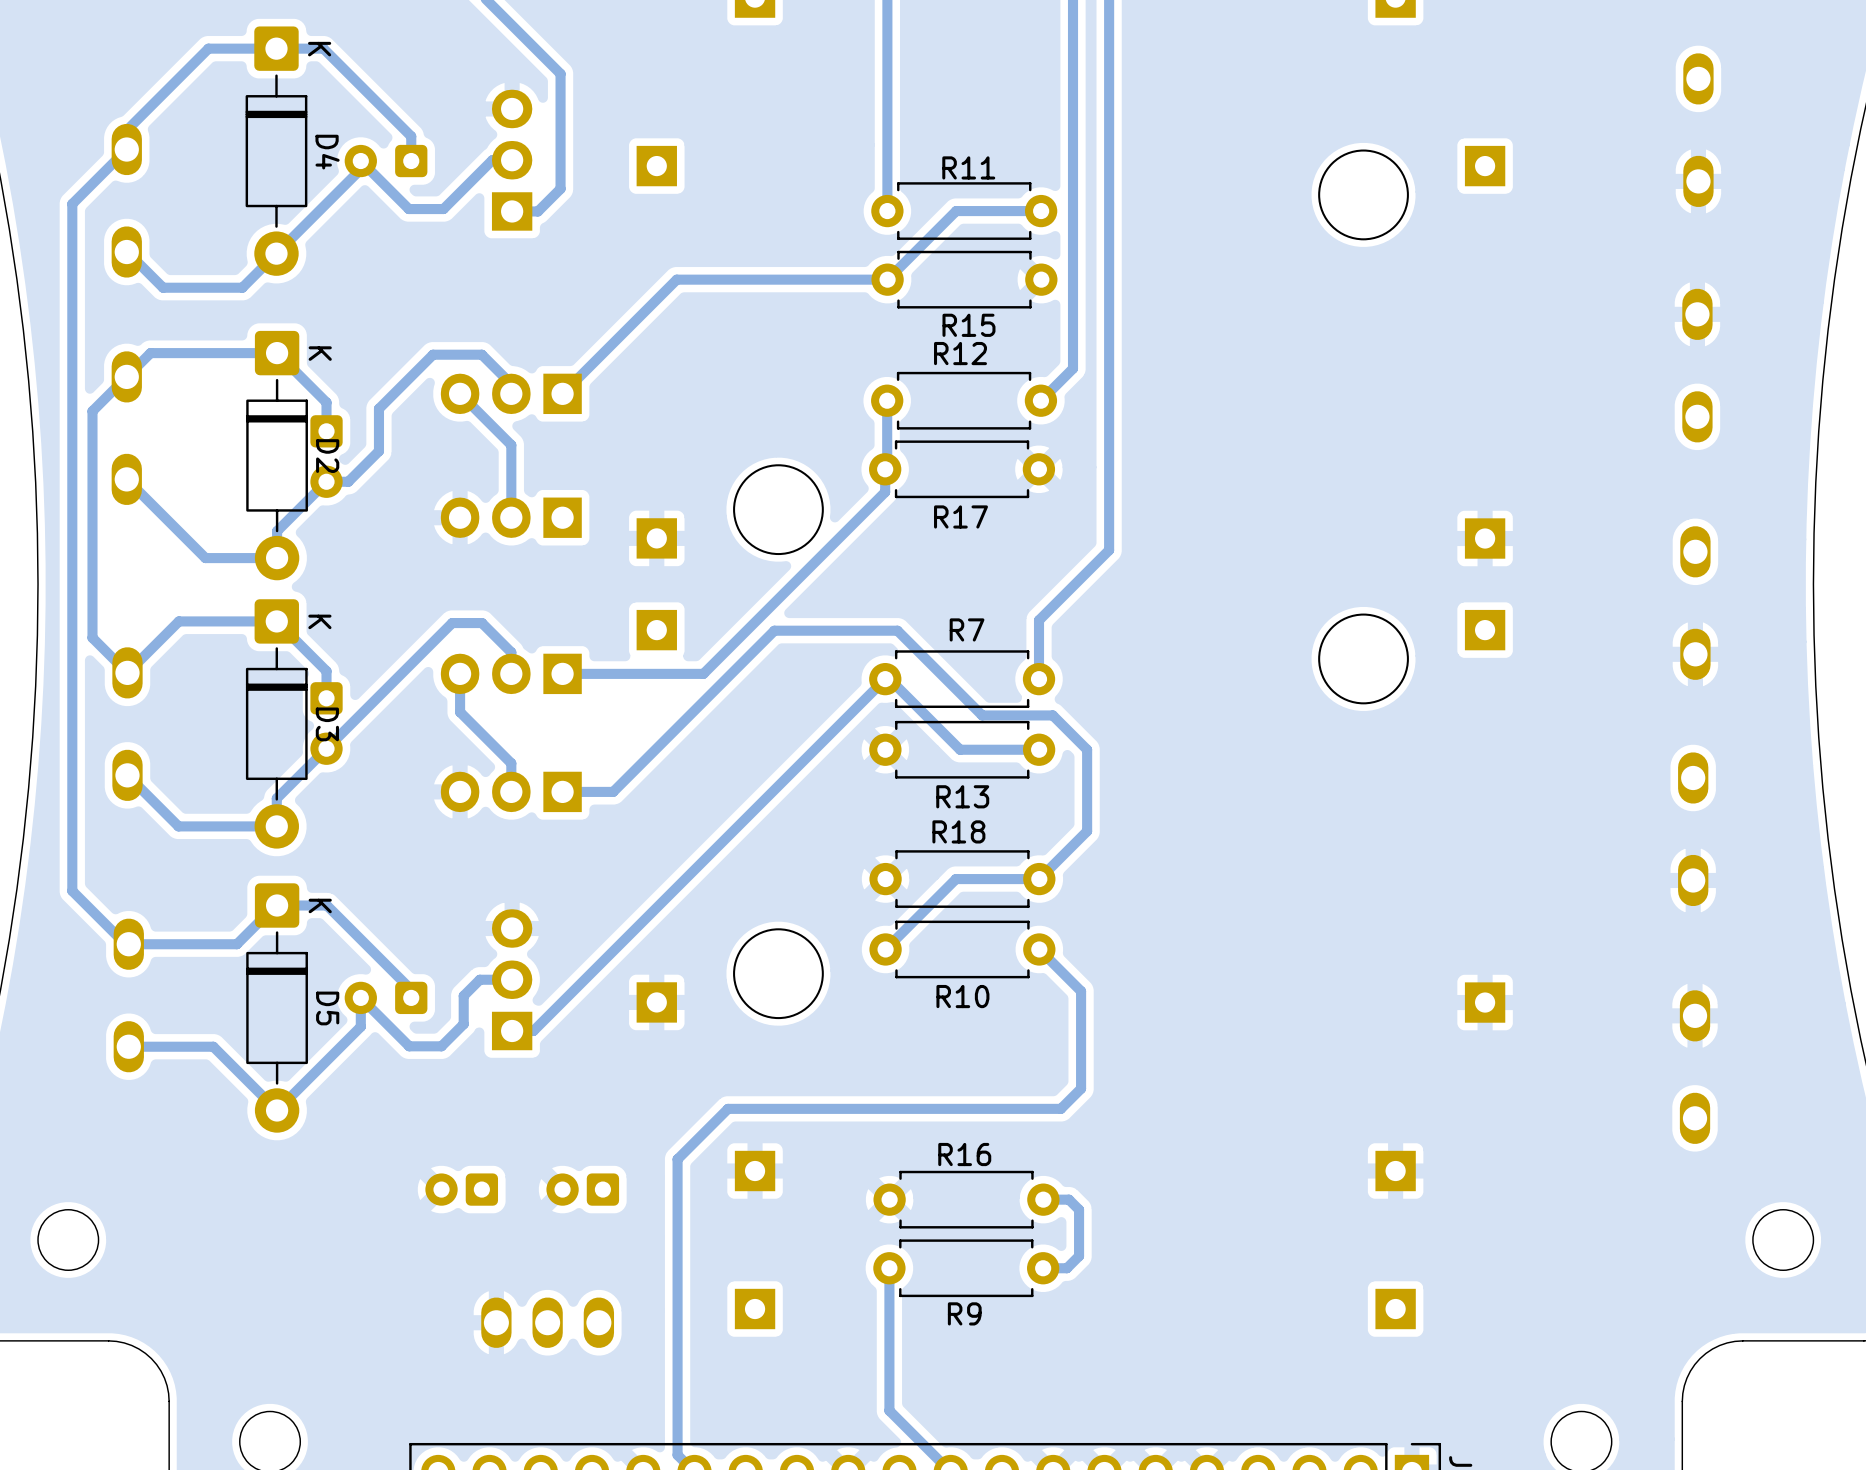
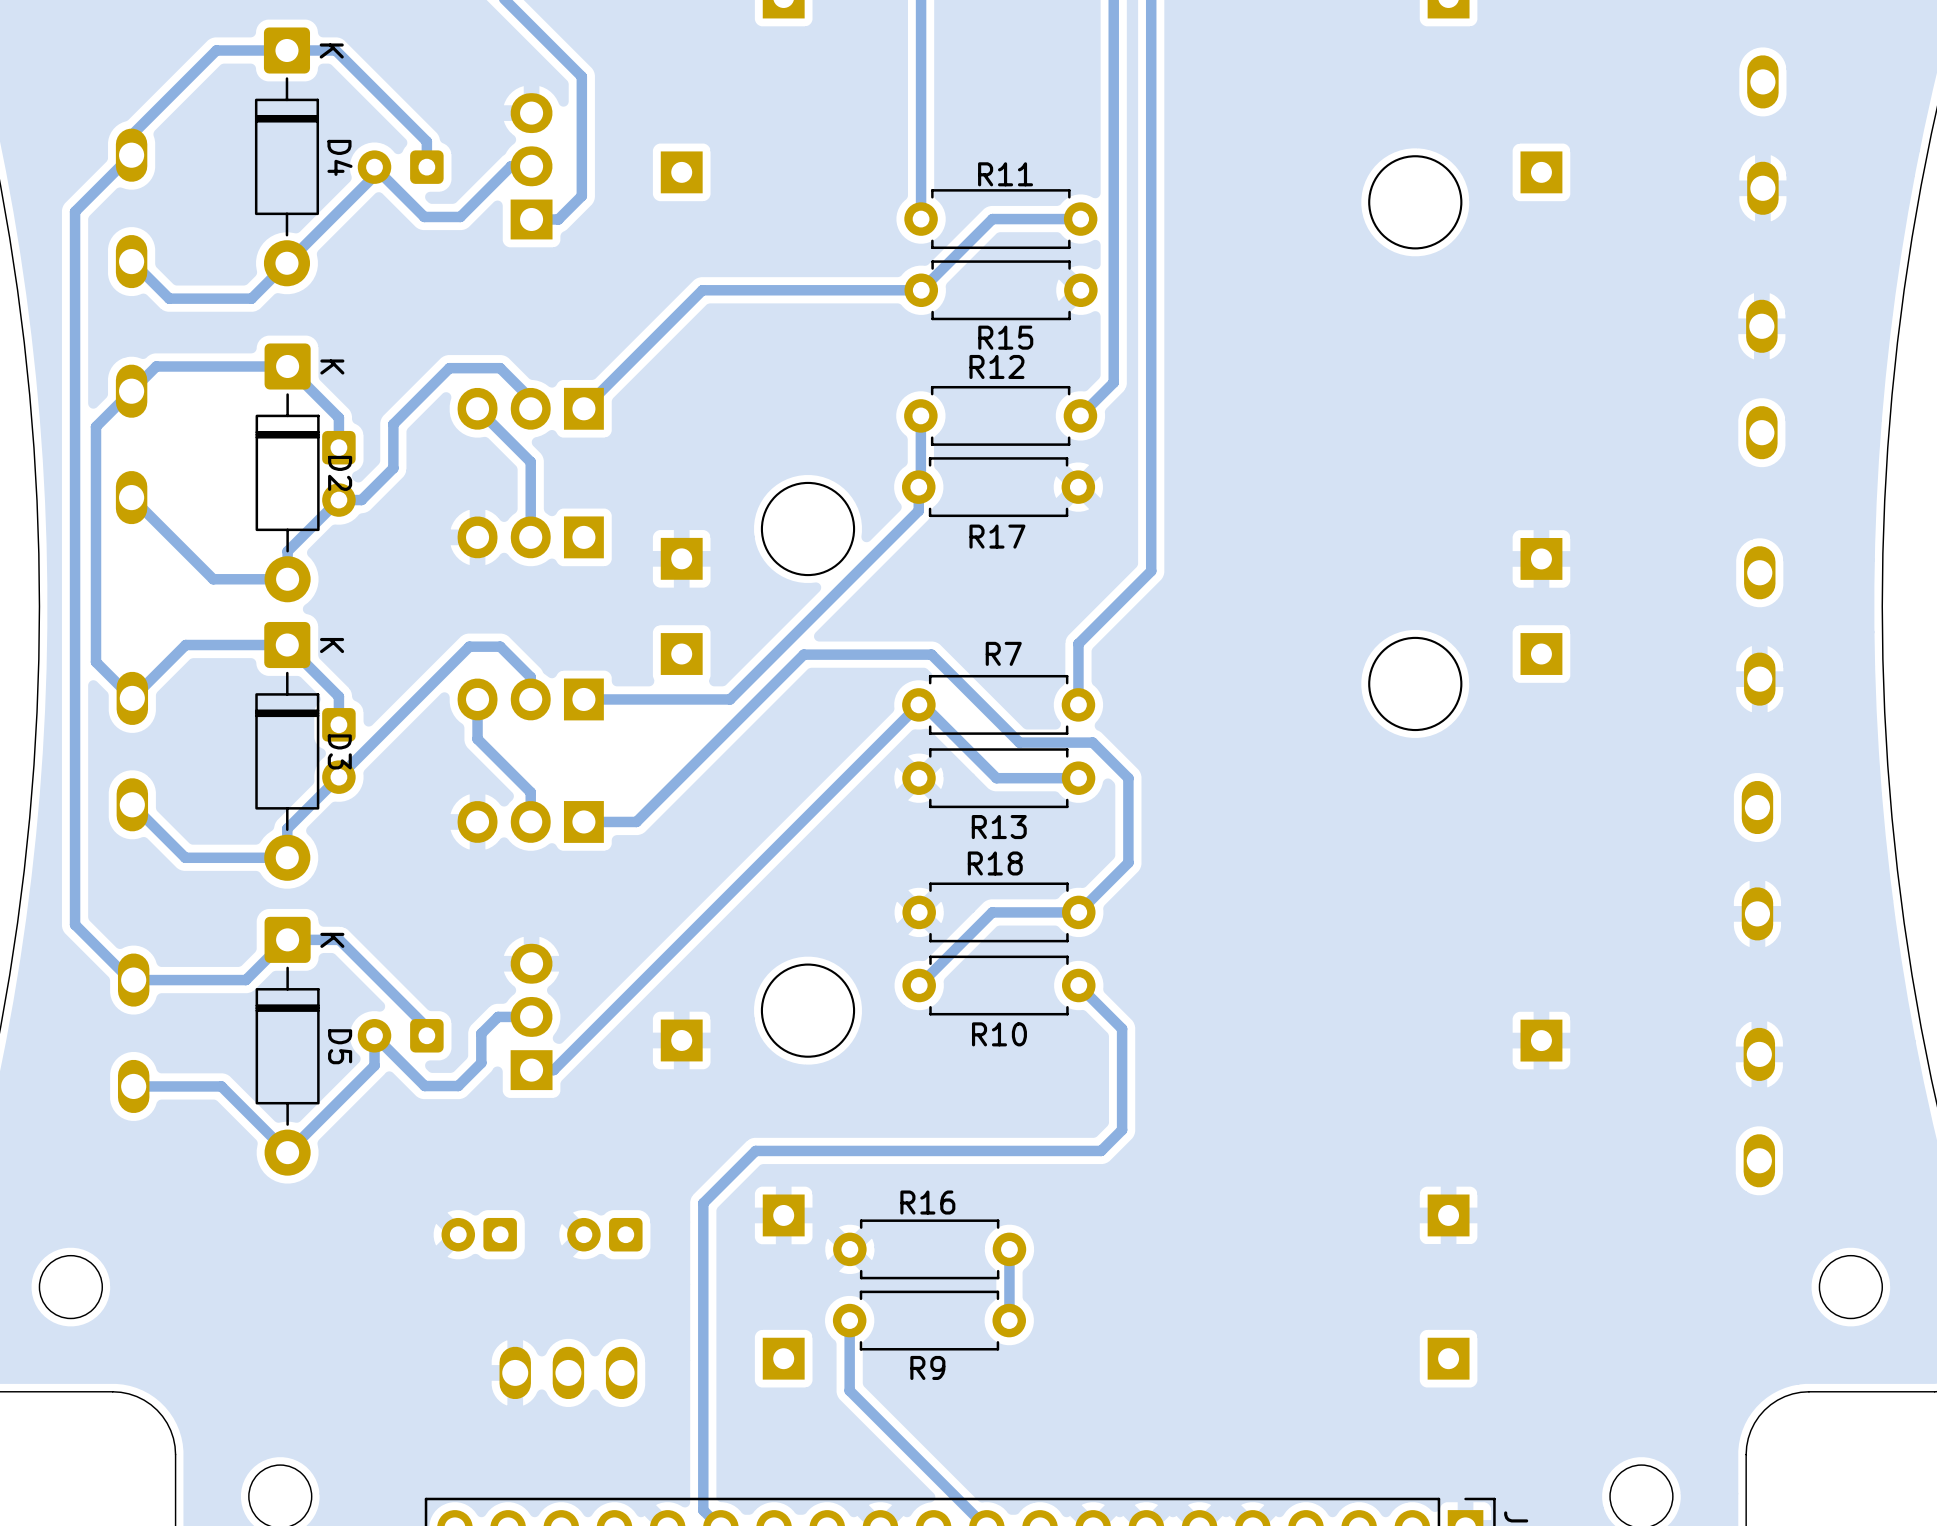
R16 position: (966, 1199) -> (929, 1249)
track: (1043, 1199) (1068, 1199) (1079, 1209) (1079, 1256) (1066, 1268) (1043, 1268) -> none
track: none -> (1009, 1249) (1009, 1320)
track: (889, 1268) (889, 1410) -> (849, 1320) (849, 1390) (923, 1464)
R9 position: (966, 1268) -> (929, 1320)

